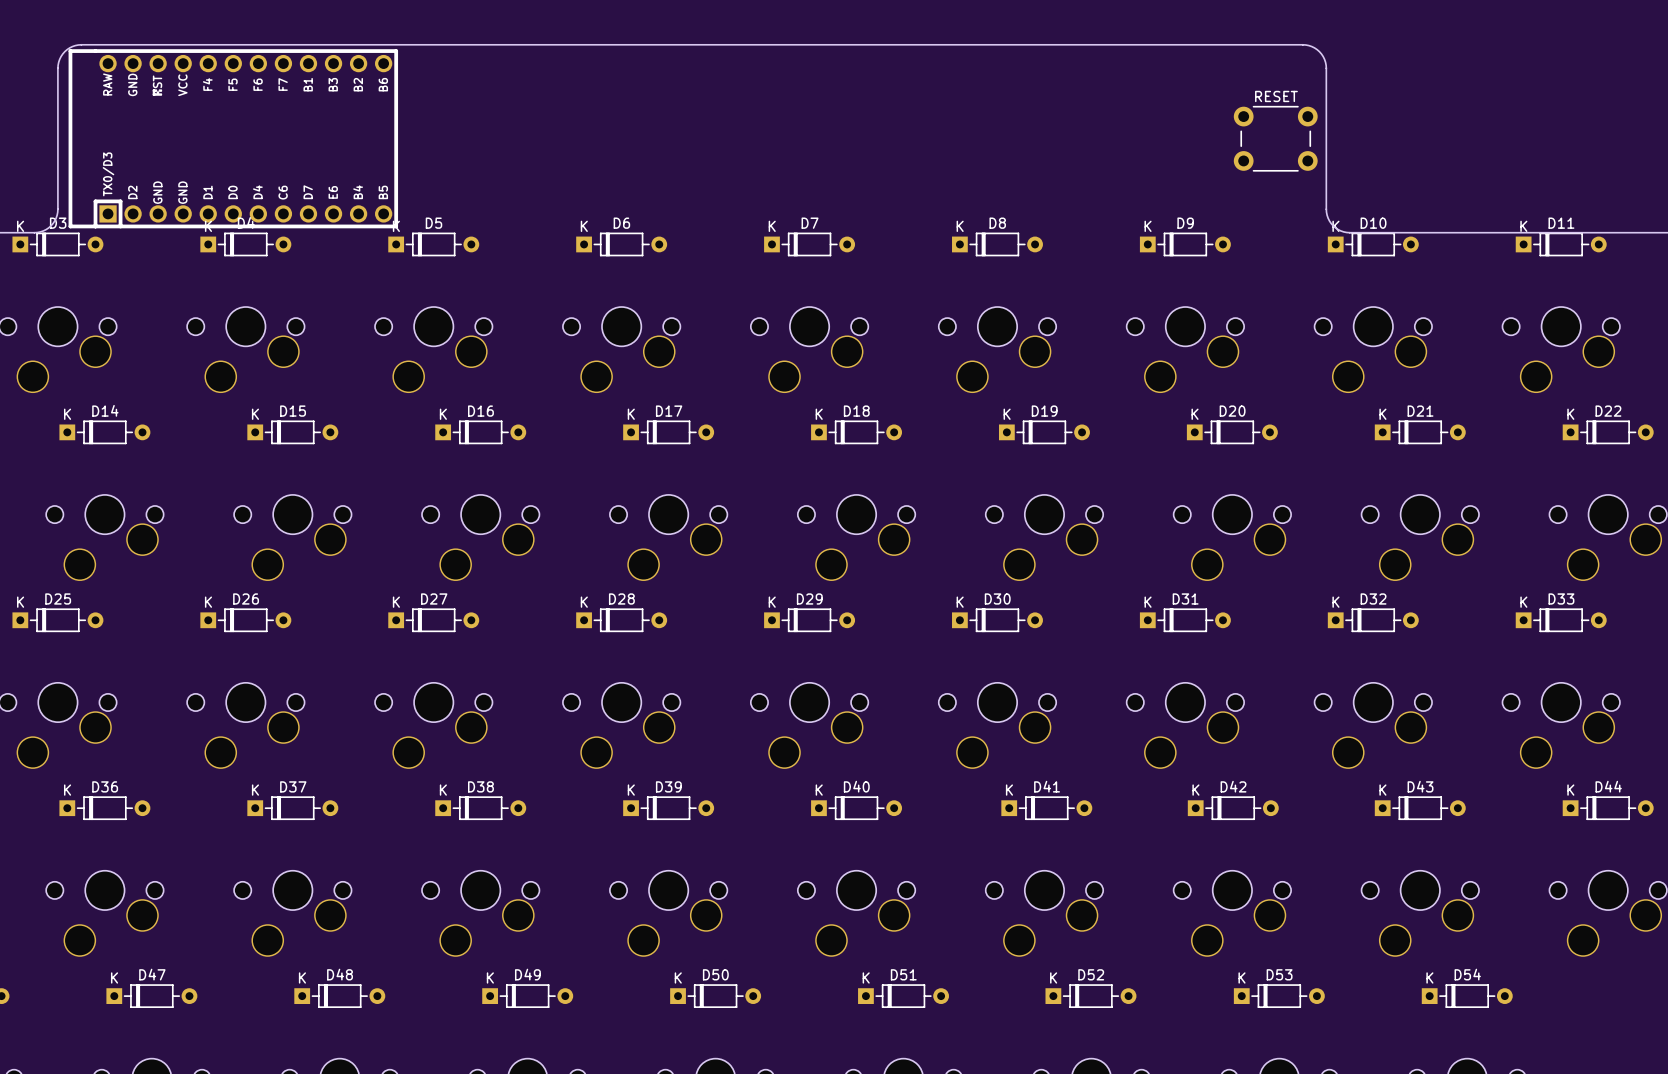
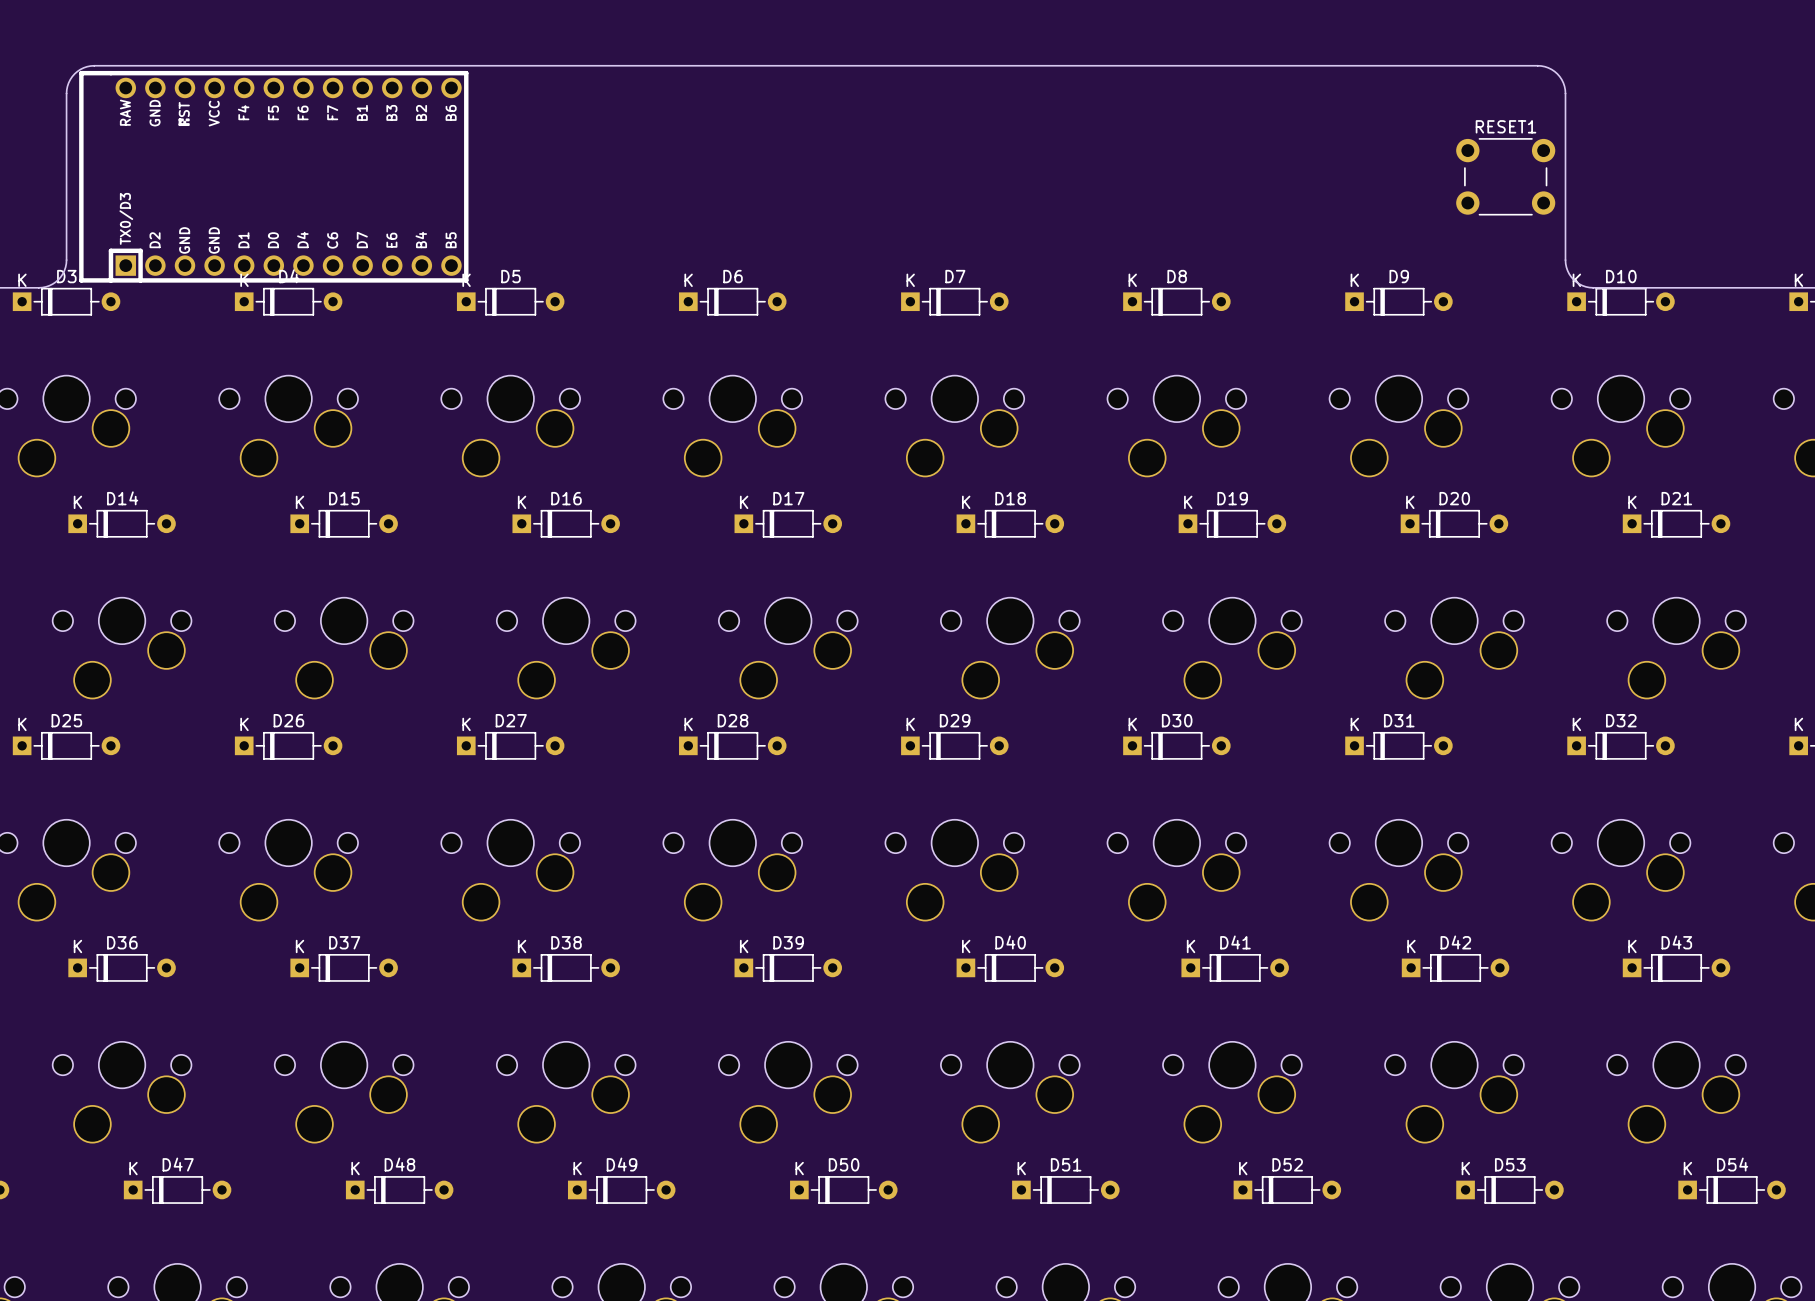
RESET name: RESET (1276, 96) -> RESET1 (1505, 126)

